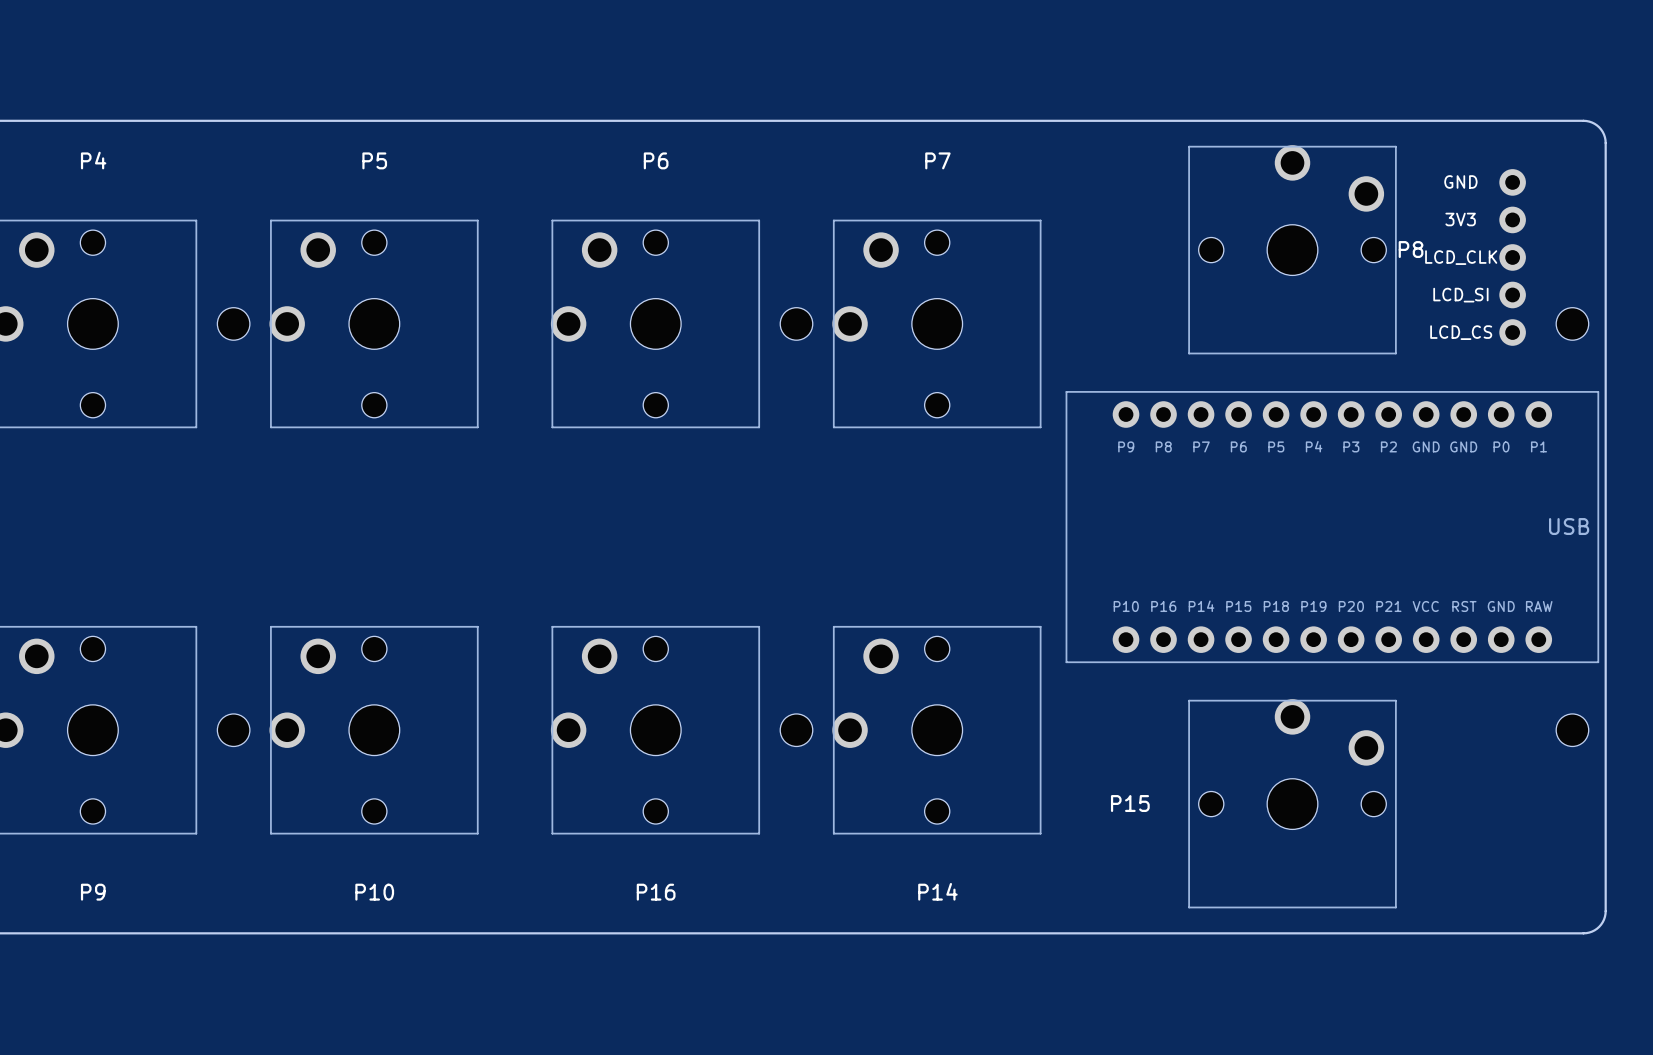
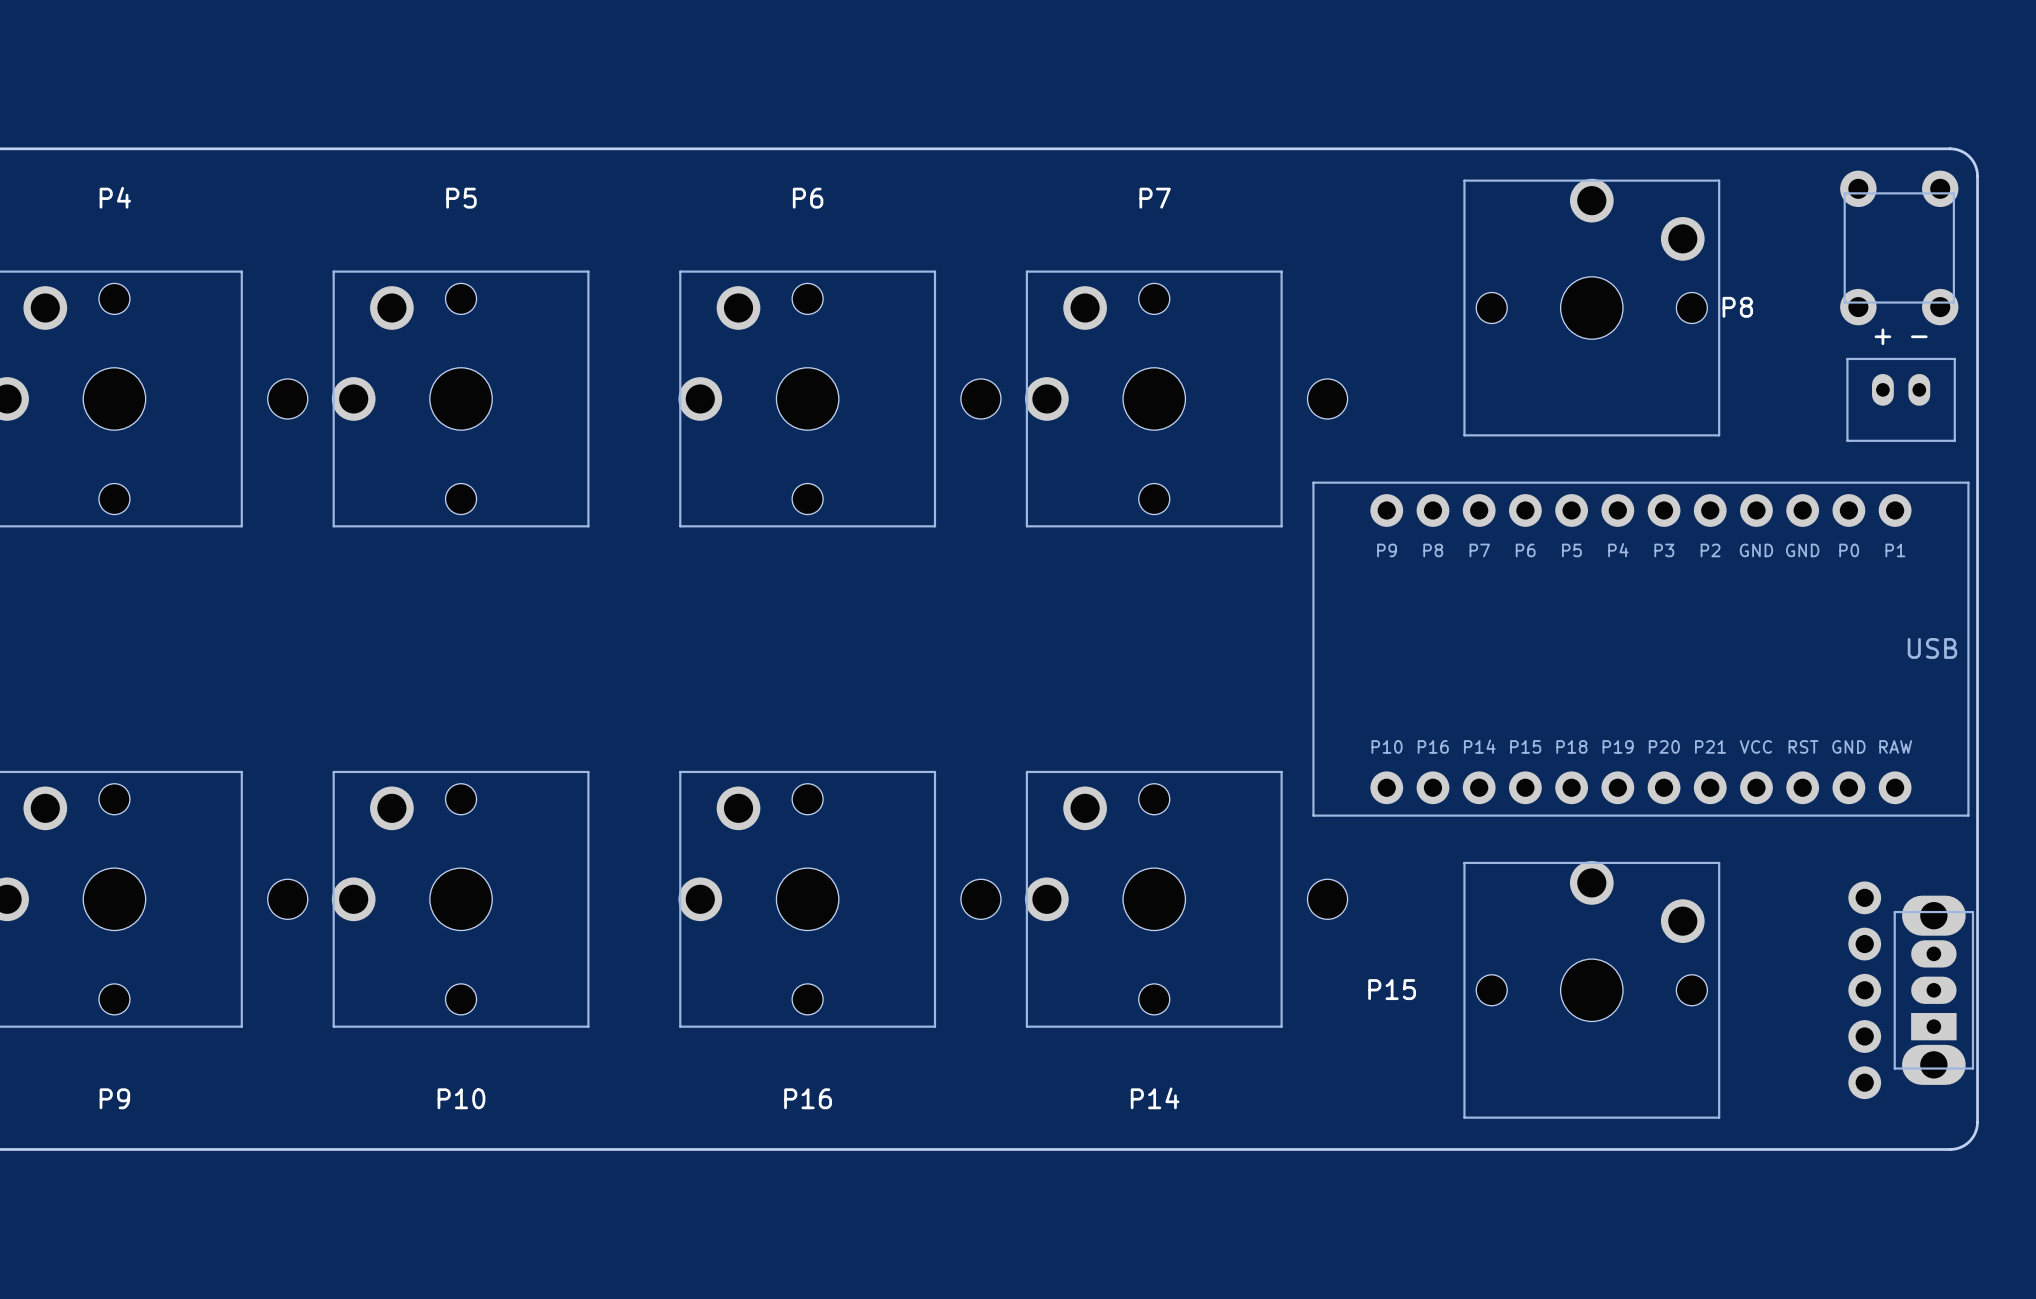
part: none -> (1899, 247)
part: (1512, 257) -> none
part: none -> (1327, 398)
part: (1572, 323) -> none
part: none -> (1901, 399)
part: none -> (1327, 899)
part: (1572, 730) -> none
part: none -> (1864, 990)
part: none -> (1933, 990)

